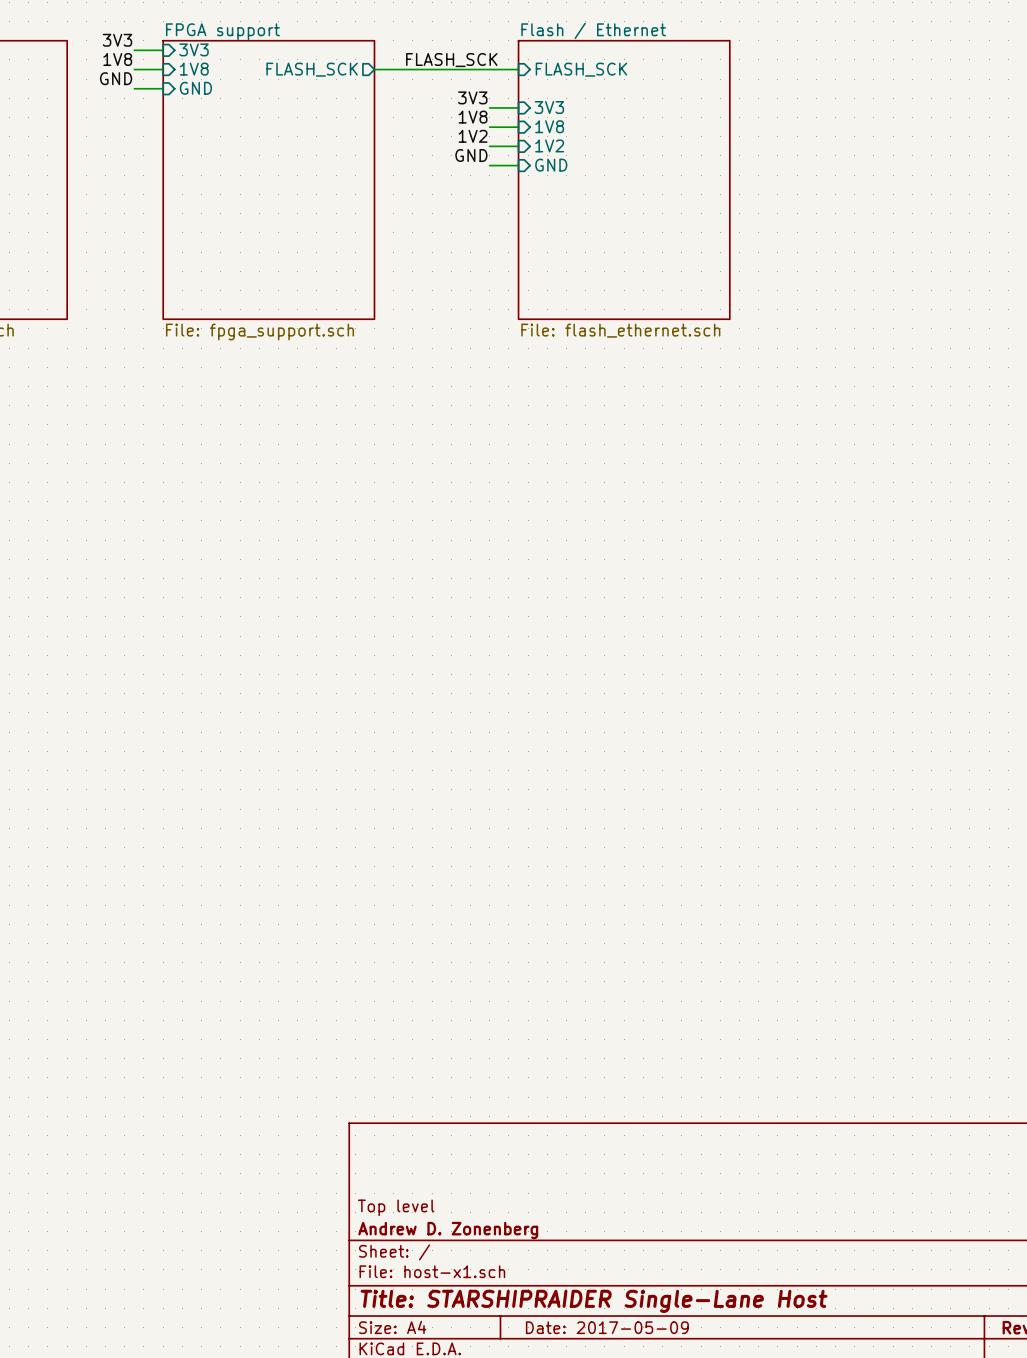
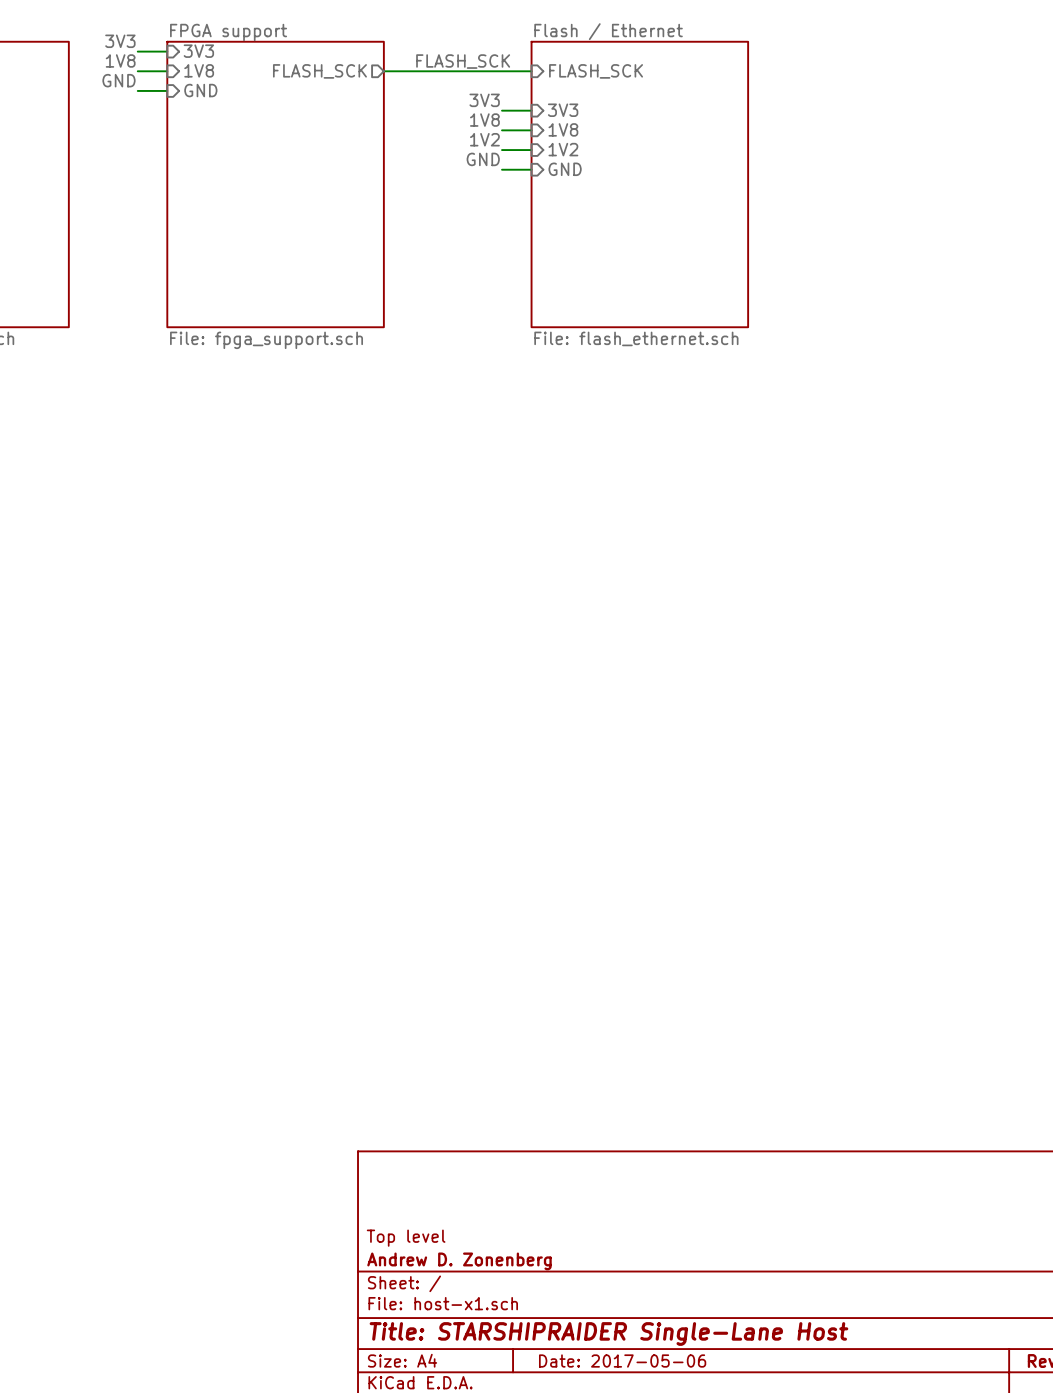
title block: Date: 2017-05-09 (607, 1327) -> Date: 2017-05-06 (622, 1361)

